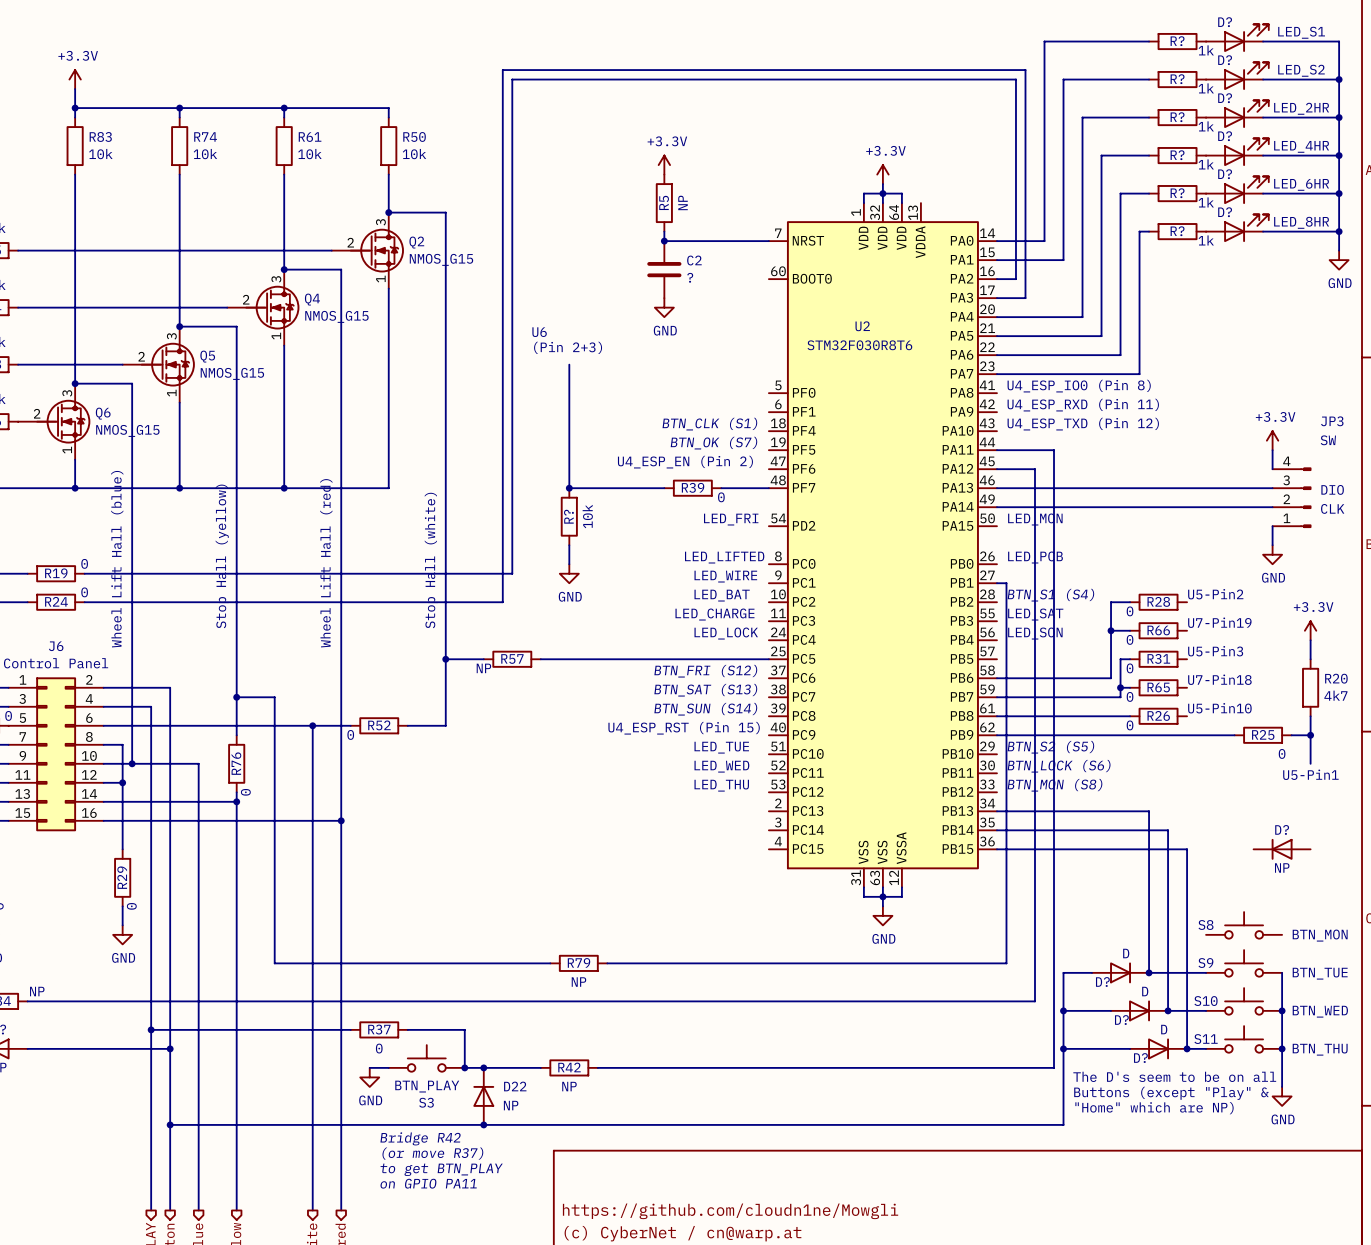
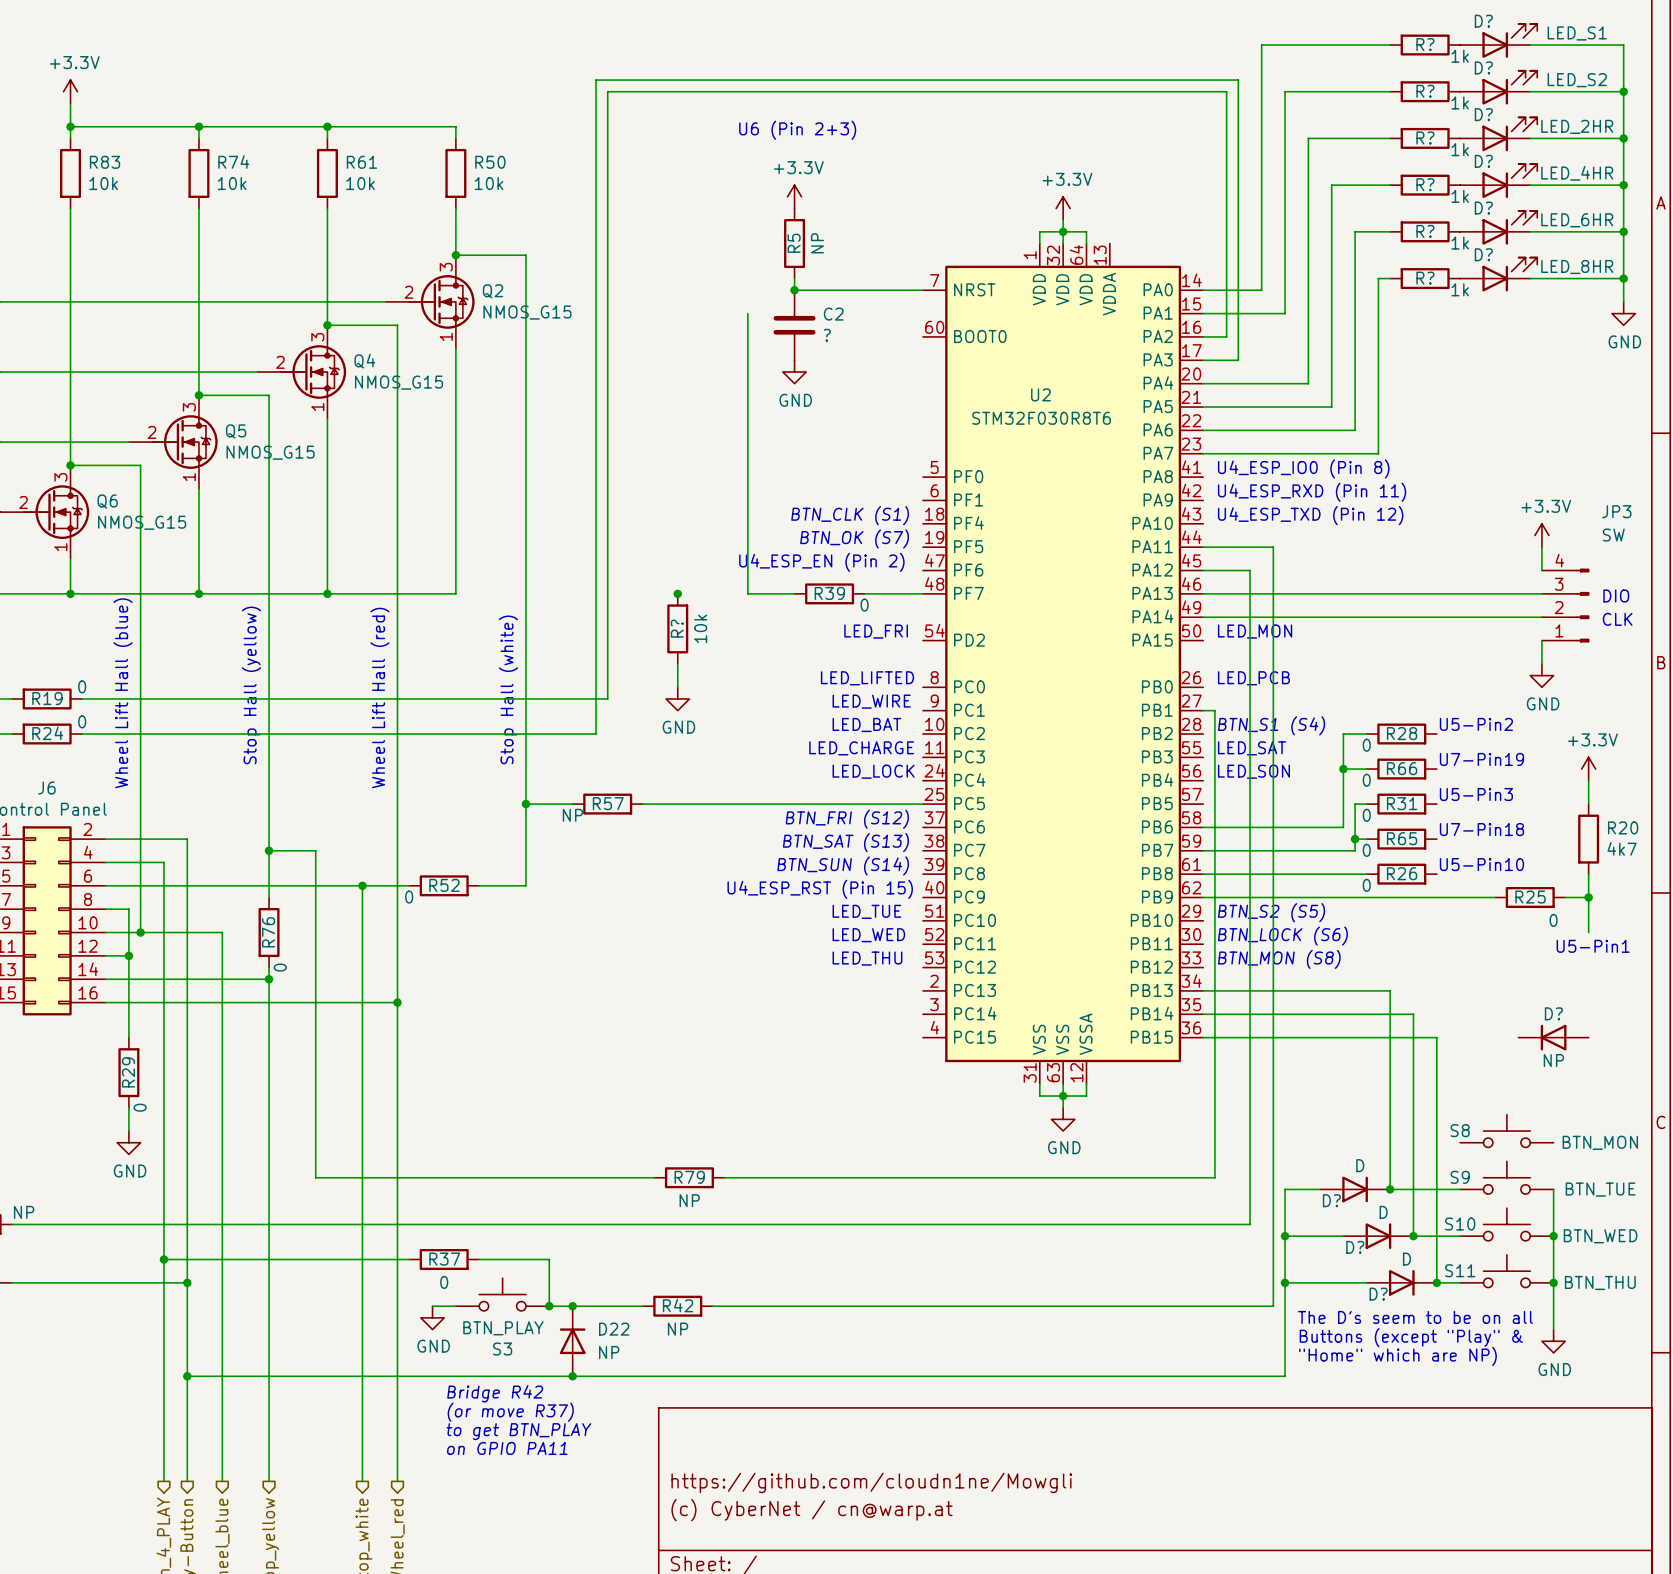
text: none -> U6 (Pin 2+3) (797, 130)
text: U6 (539, 332) -> none
text: (Pin 2+3) (568, 347) -> none
wire: (569, 364) (569, 488) (626, 488) -> (747, 313) (747, 593)

